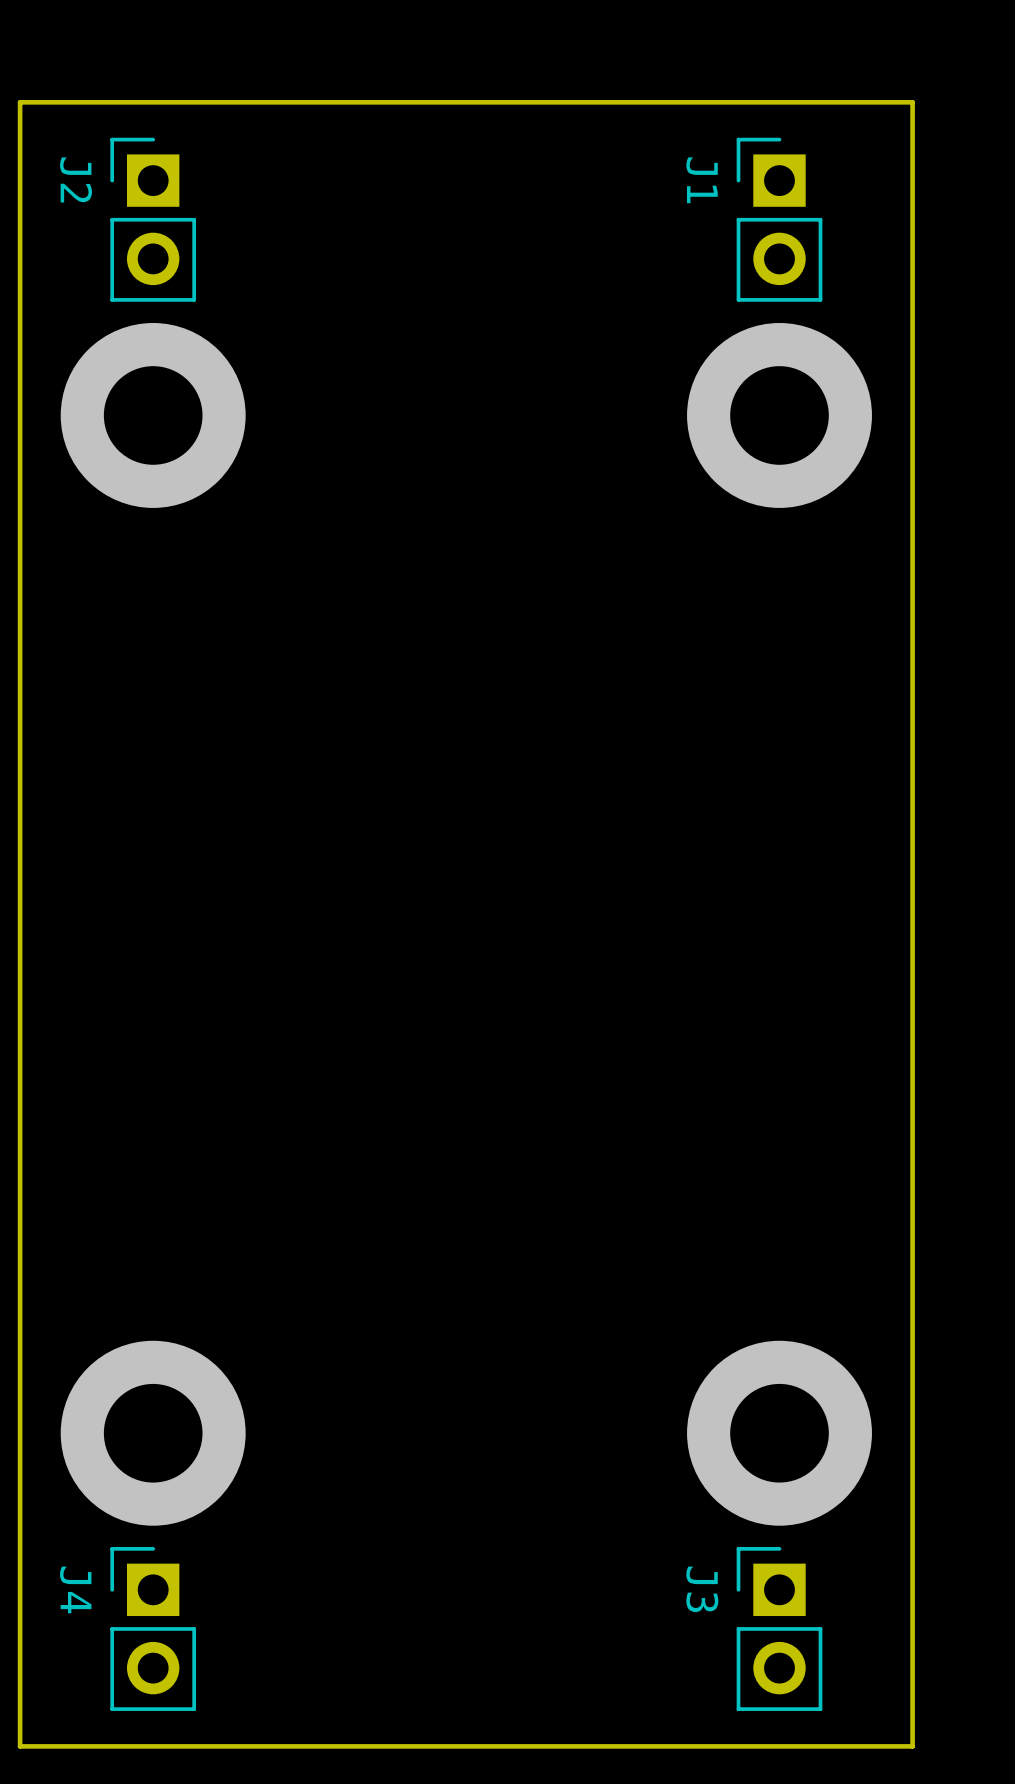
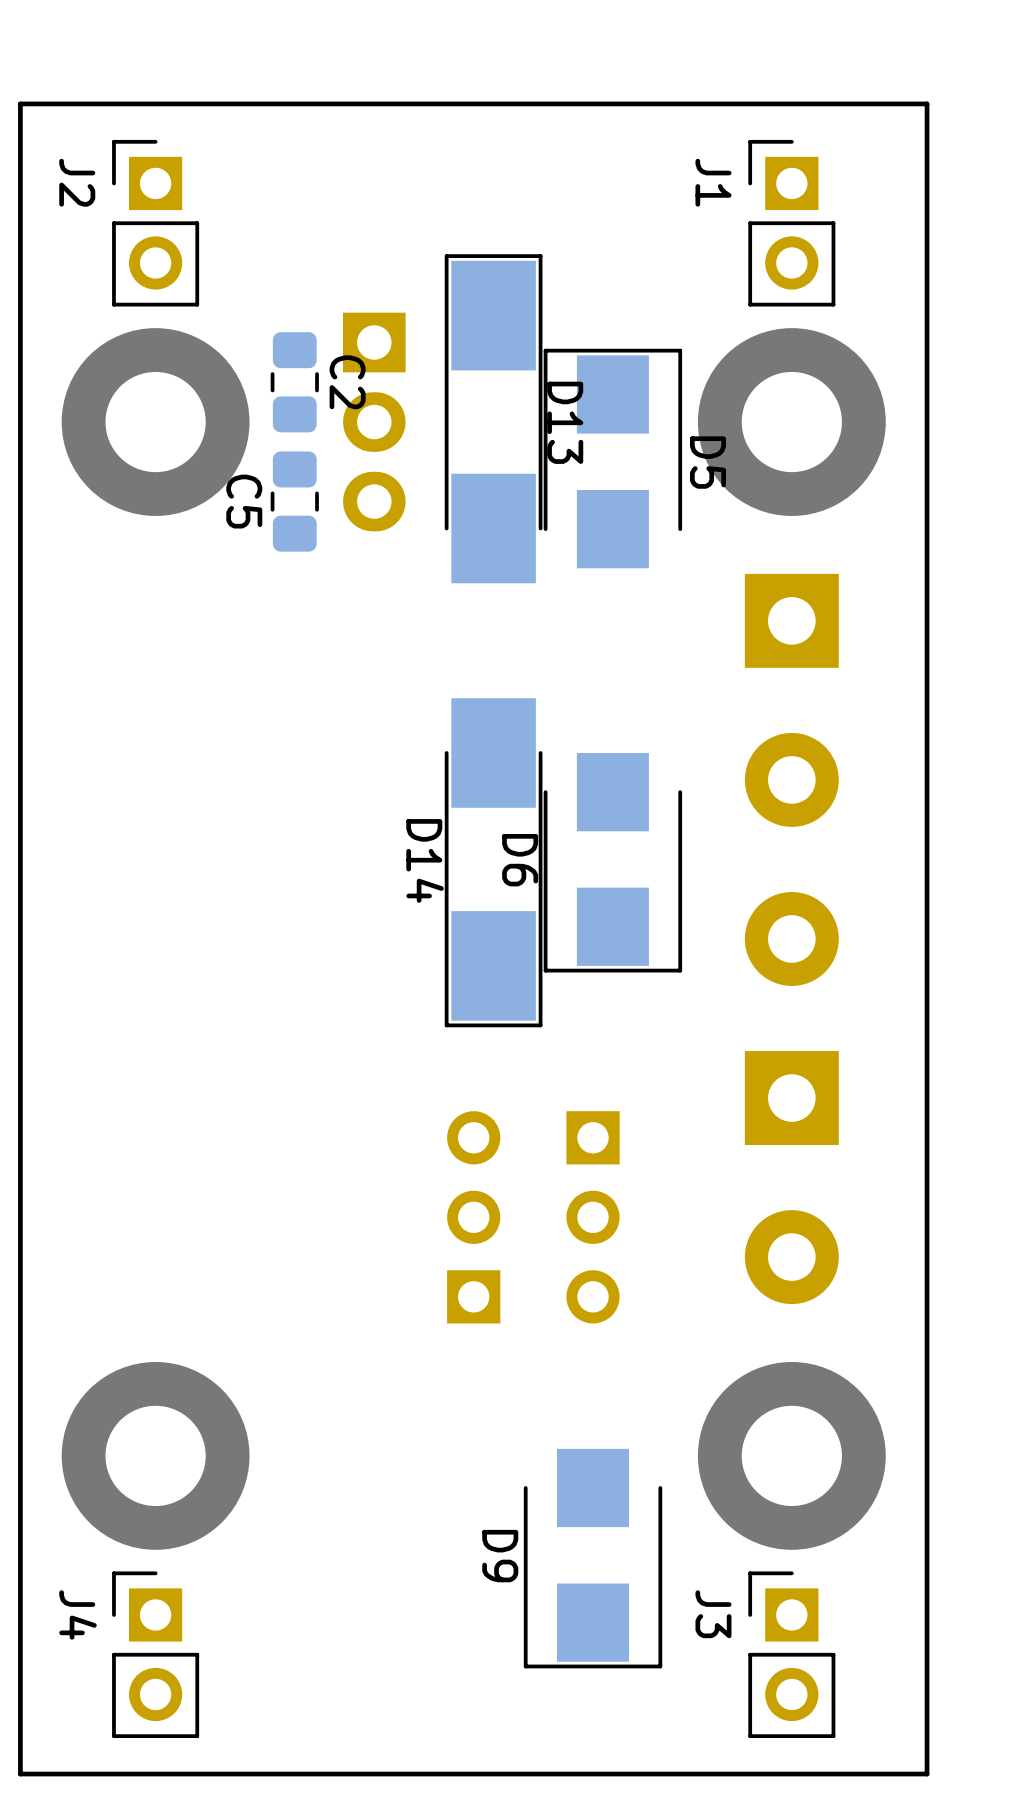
C2: none -> (294, 382)
D13: none -> (493, 418)
part: none -> (374, 422)
D5: none -> (612, 458)
C5: none -> (294, 501)
part: none -> (791, 779)
D14: none -> (493, 862)
D6: none -> (612, 862)
part: none -> (791, 1177)
part: none -> (473, 1217)
part: none -> (593, 1217)
D9: none -> (593, 1558)

